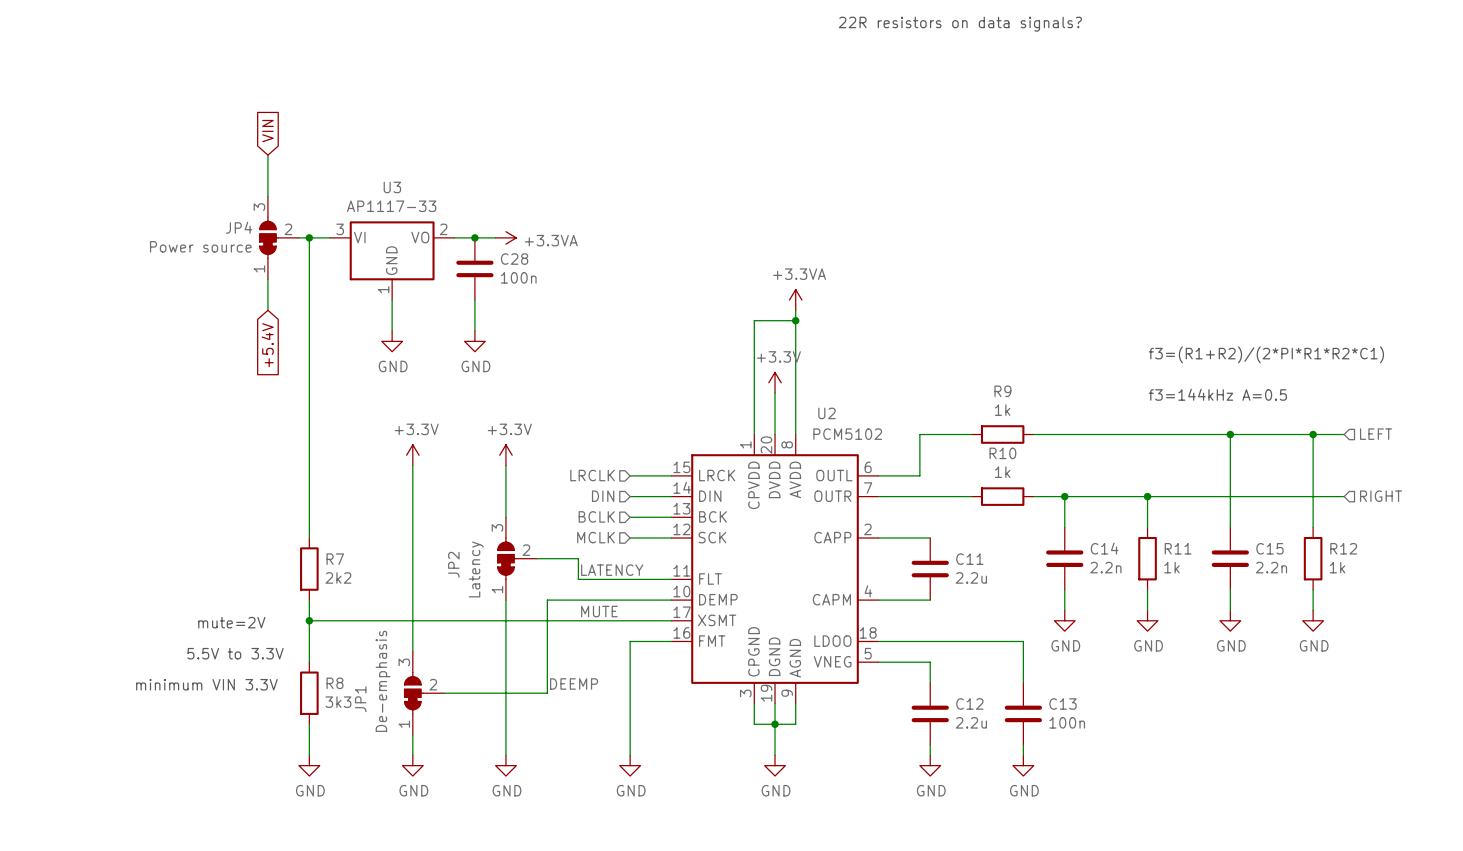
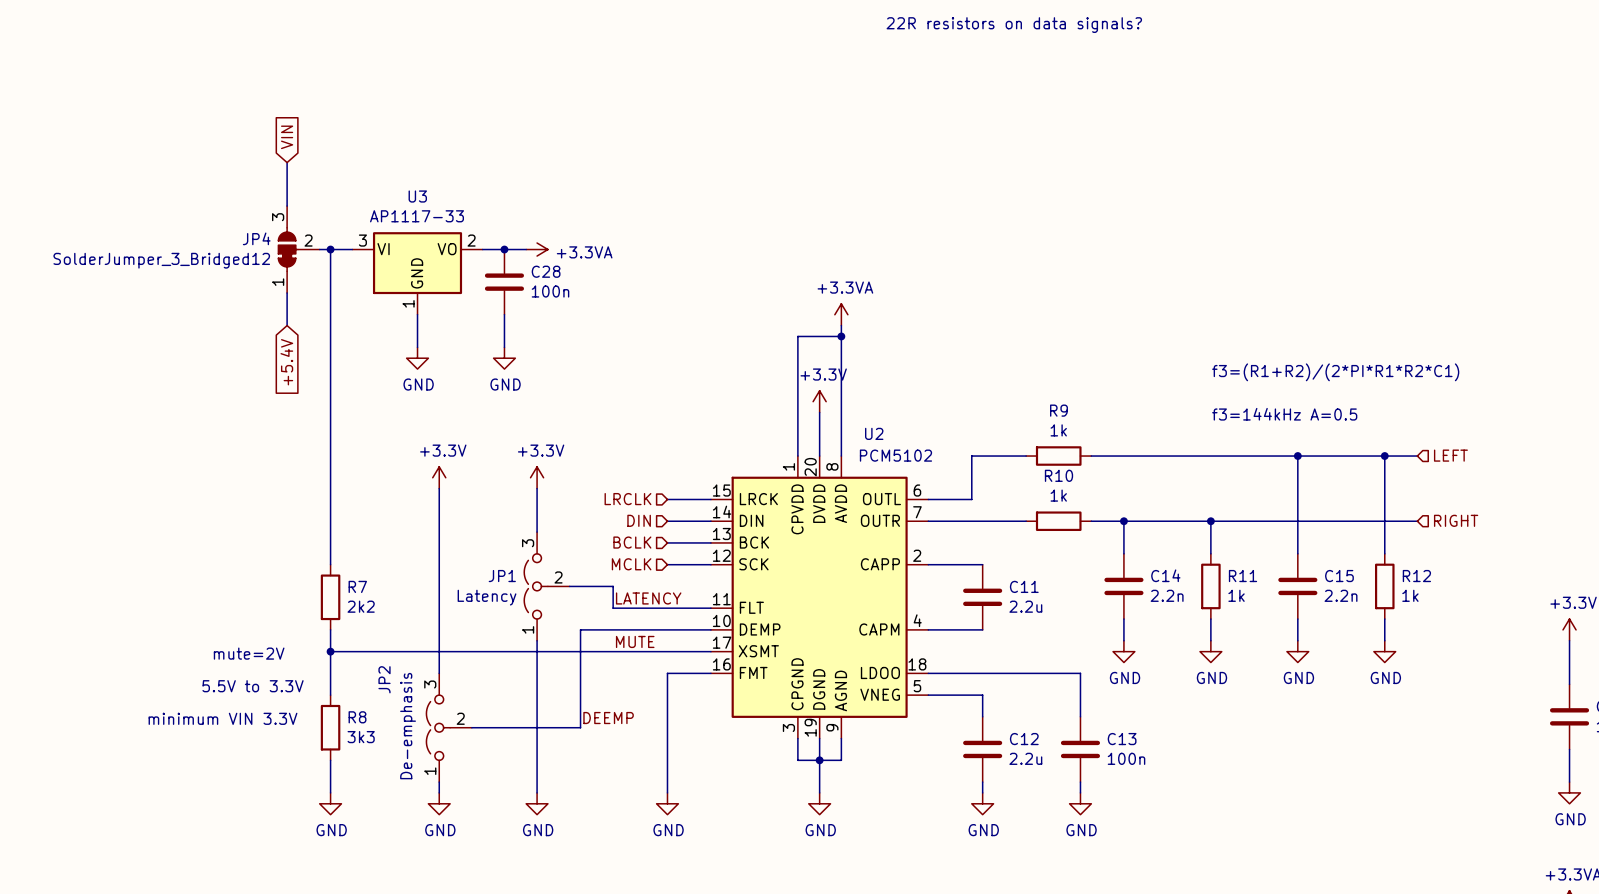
JP4 value: Power source (200, 246) -> SolderJumper_3_Bridged12 (161, 260)
JP2 symbol: [497, 517, 538, 601] -> [426, 673, 472, 783]
JP2 name position: JP2 (453, 564) -> JP2 (384, 679)
JP2 value: Latency (476, 569) -> De-emphasis (408, 726)
JP1 symbol: [404, 651, 444, 735] -> [524, 532, 570, 641]
JP1 value: De-emphasis (383, 681) -> Latency (487, 597)
JP1 name position: JP1 (360, 699) -> JP1 (502, 576)

